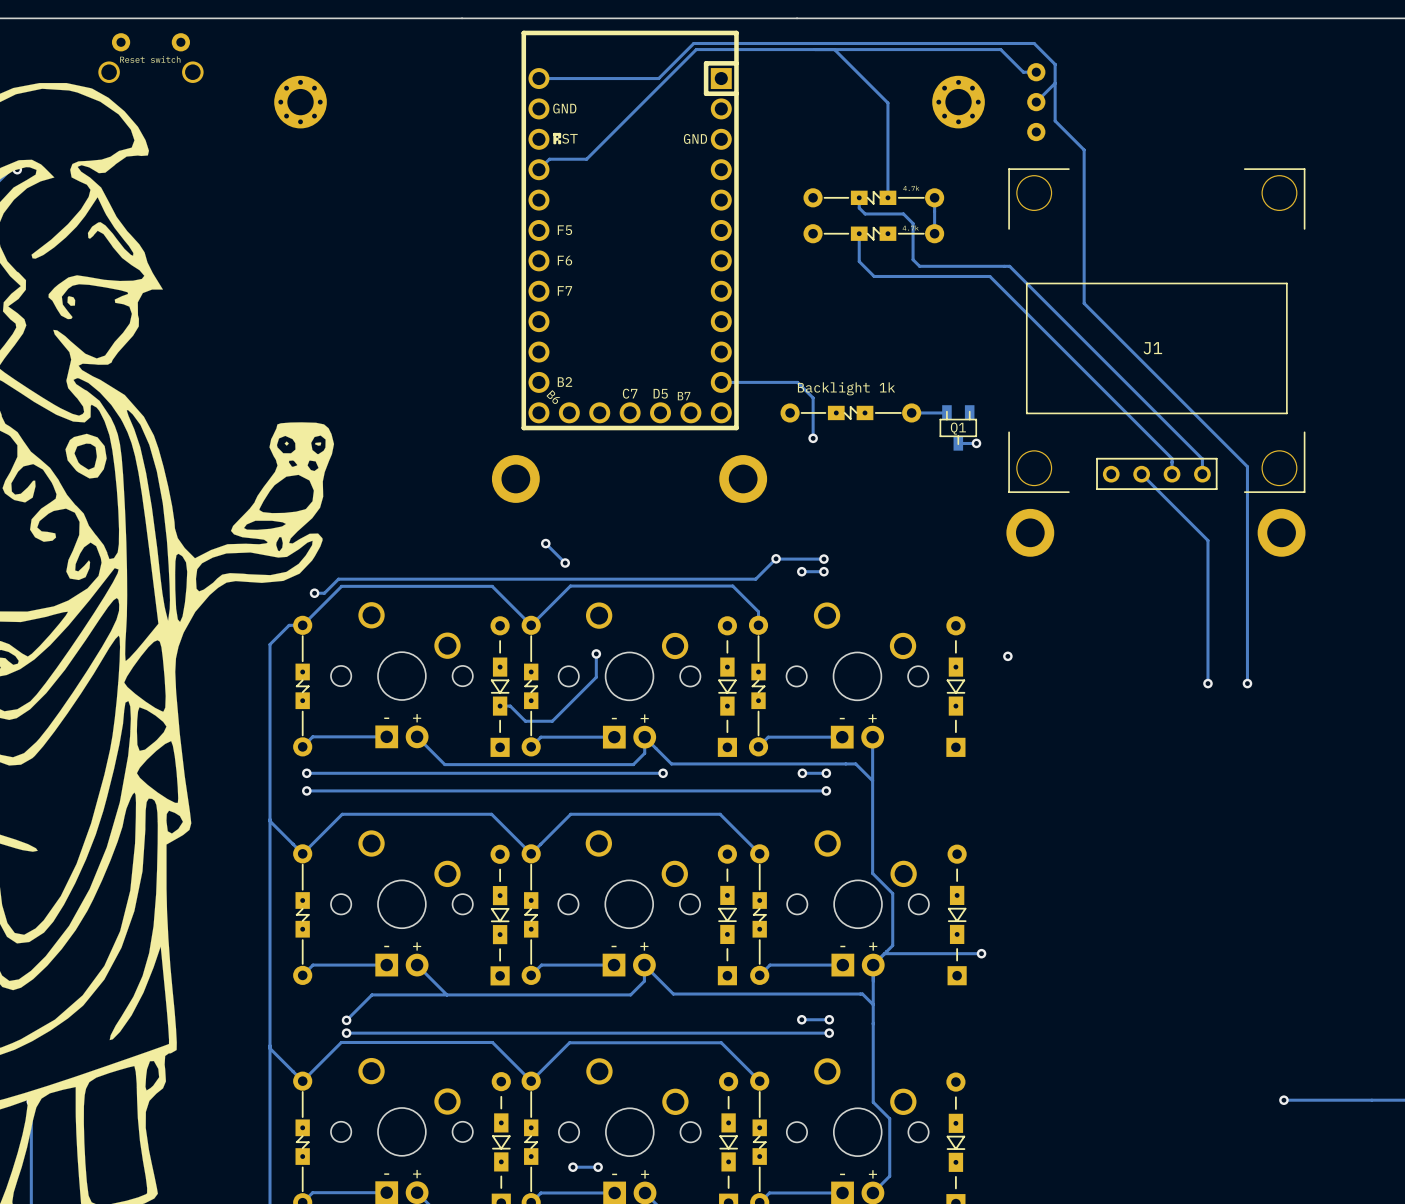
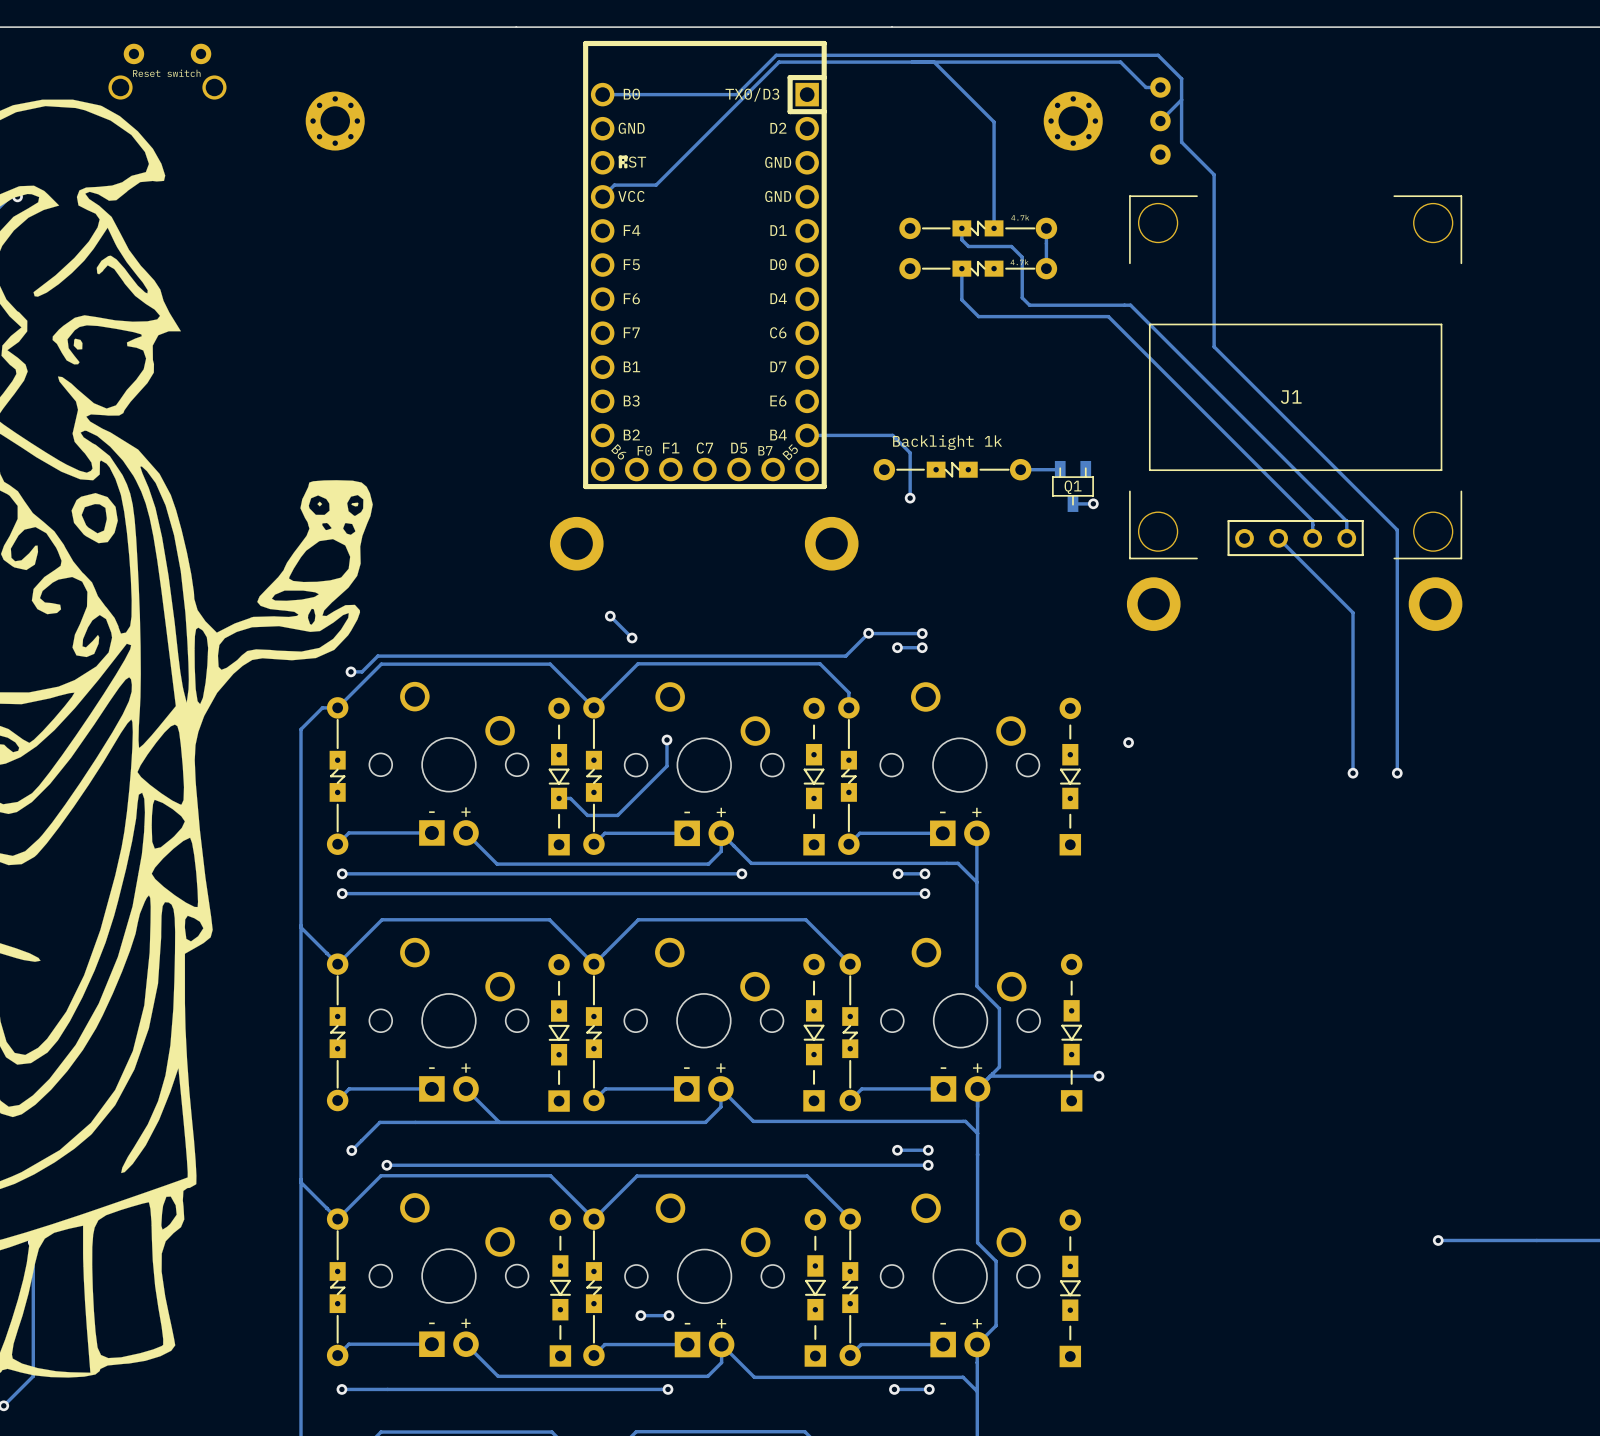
part footprint: [521, 30, 739, 431] -> [583, 40, 827, 490]
track: (372, 994) (346, 1020) -> (415, 1122) (379, 1122) (351, 1150)
via position: (346, 1020) -> (351, 1150)

